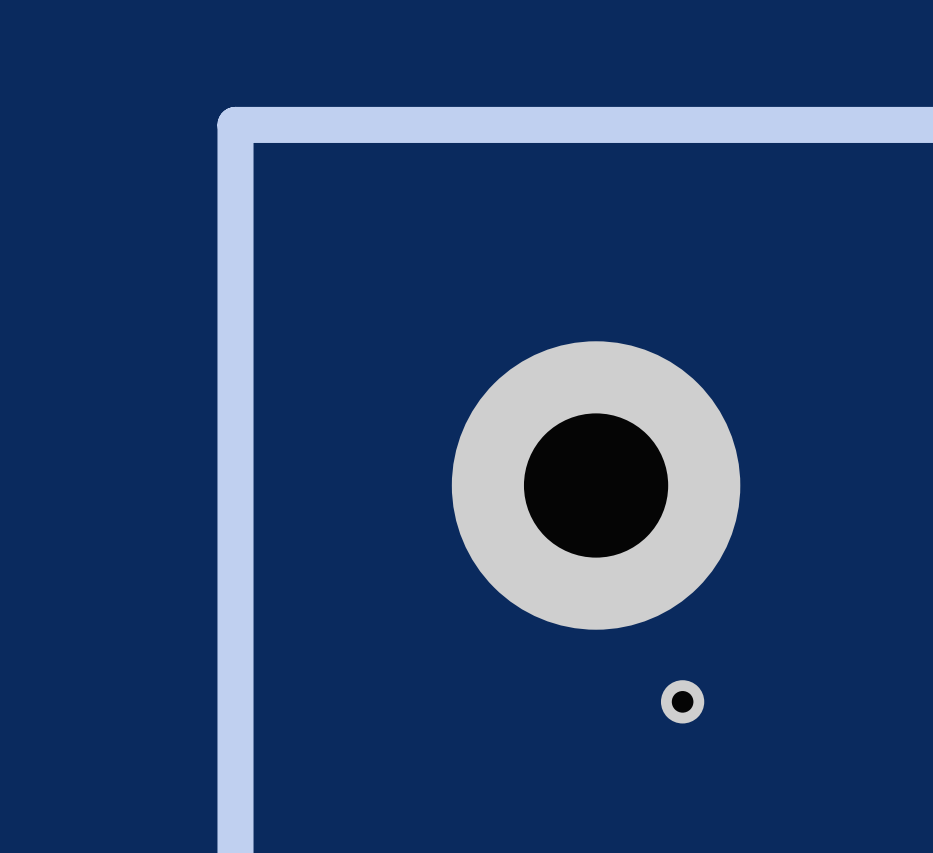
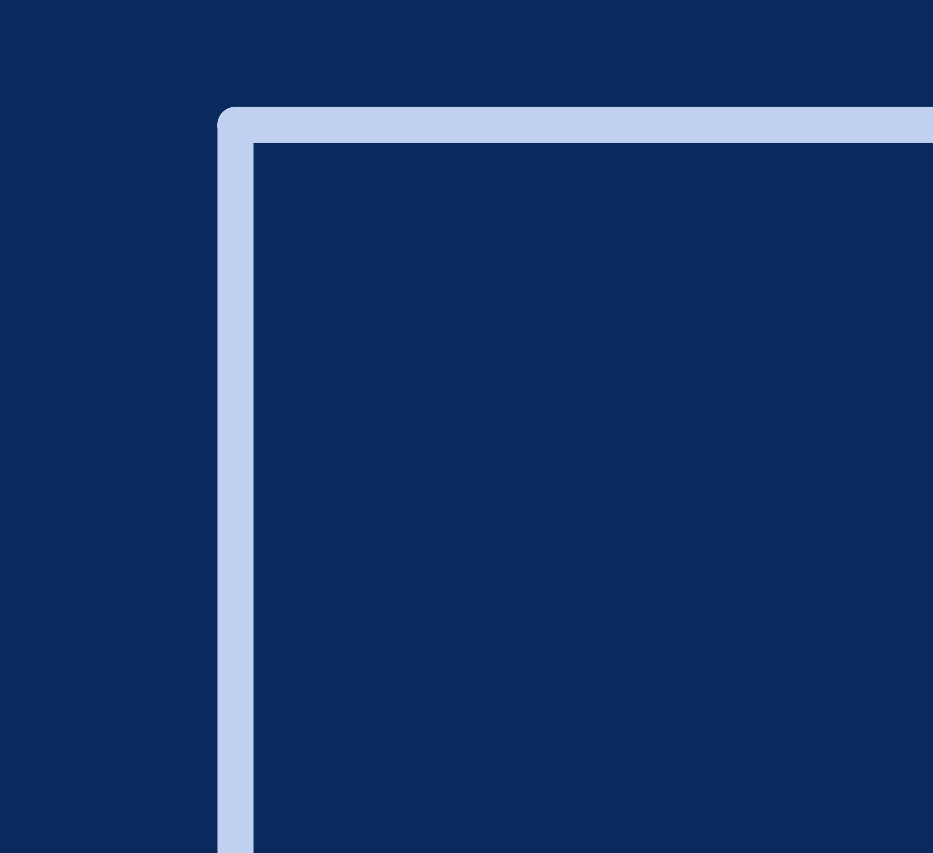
part: (596, 485) -> none
part: (682, 701) -> none

